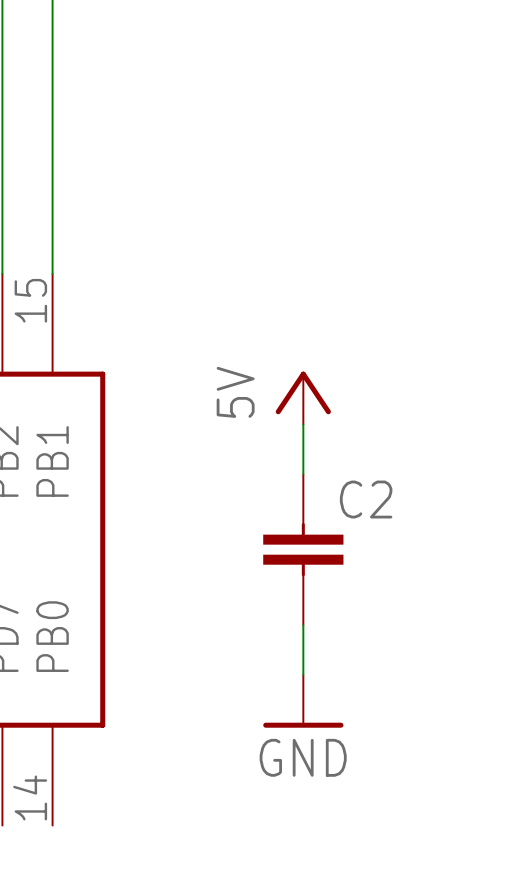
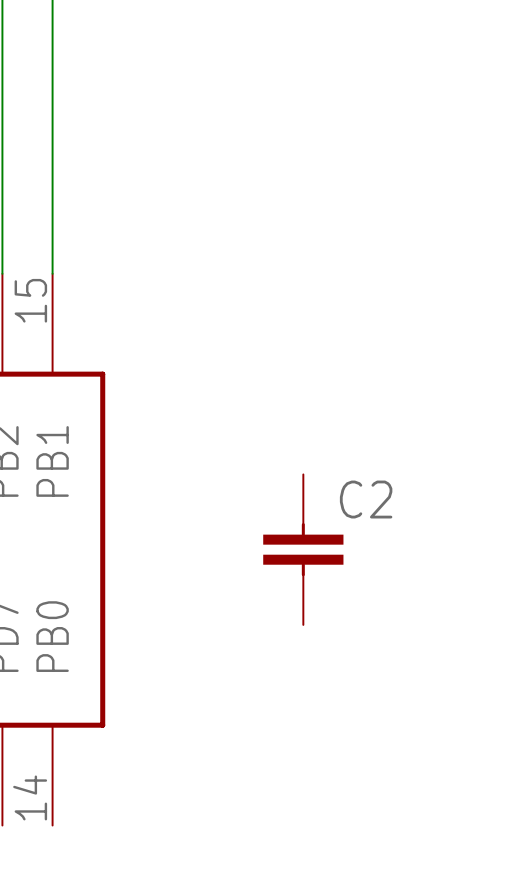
power symbol: 5V (303, 397) -> none
wire: (303, 424) (303, 474) -> none
wire: (303, 624) (303, 675) -> none
power symbol: GND (303, 701) -> none

